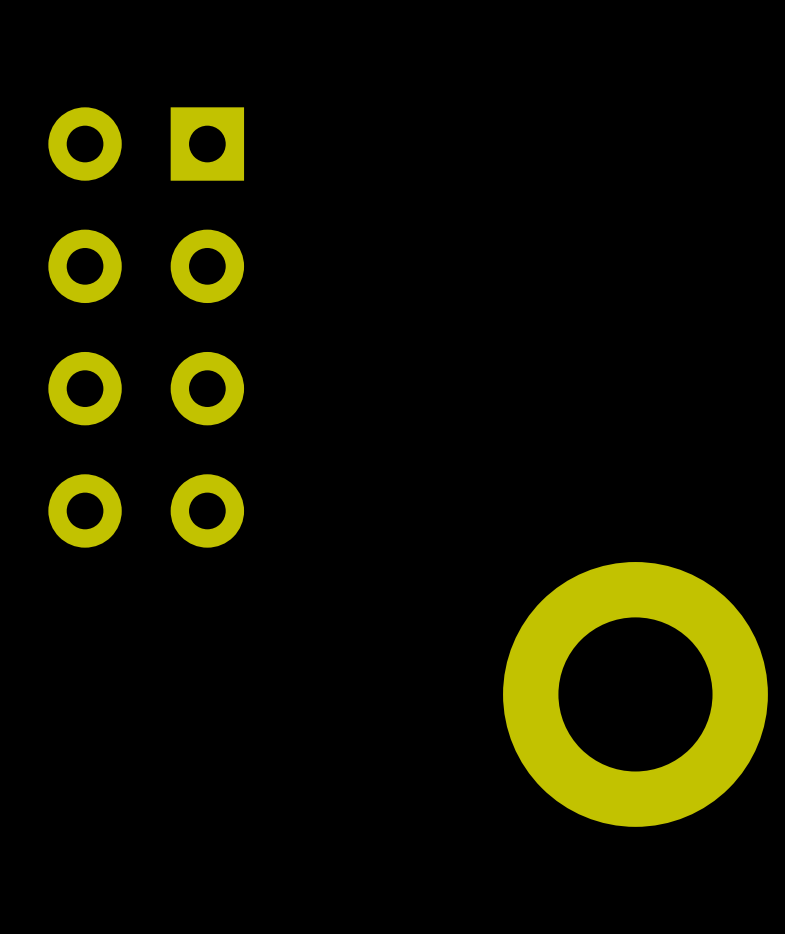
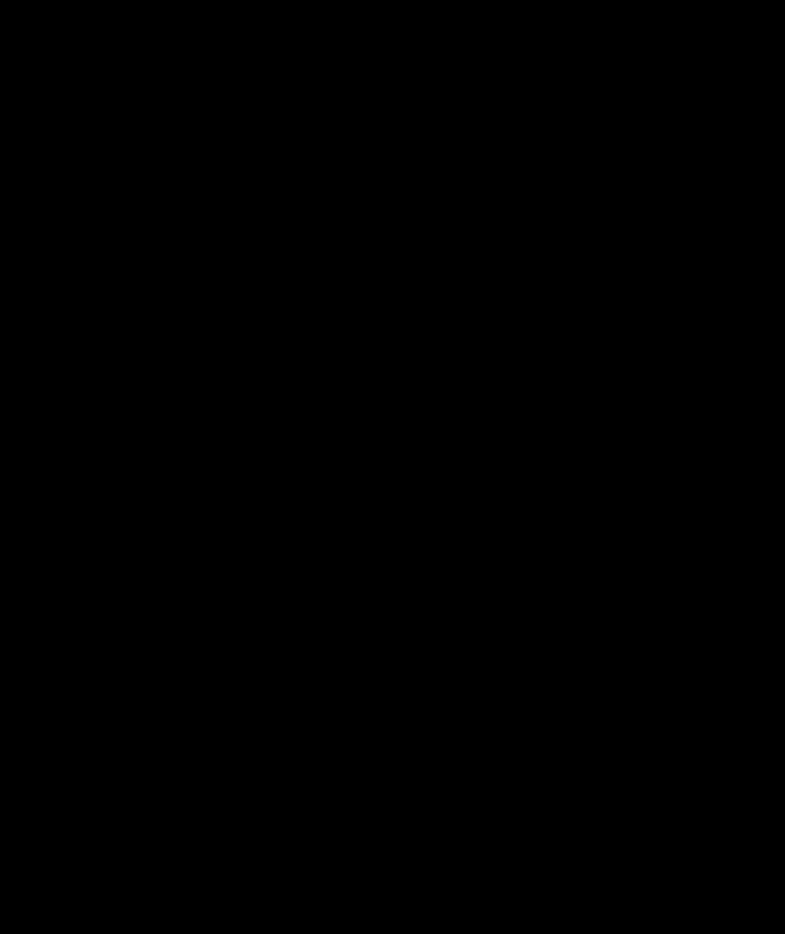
part: (146, 327) -> none
part: (635, 694) -> none

